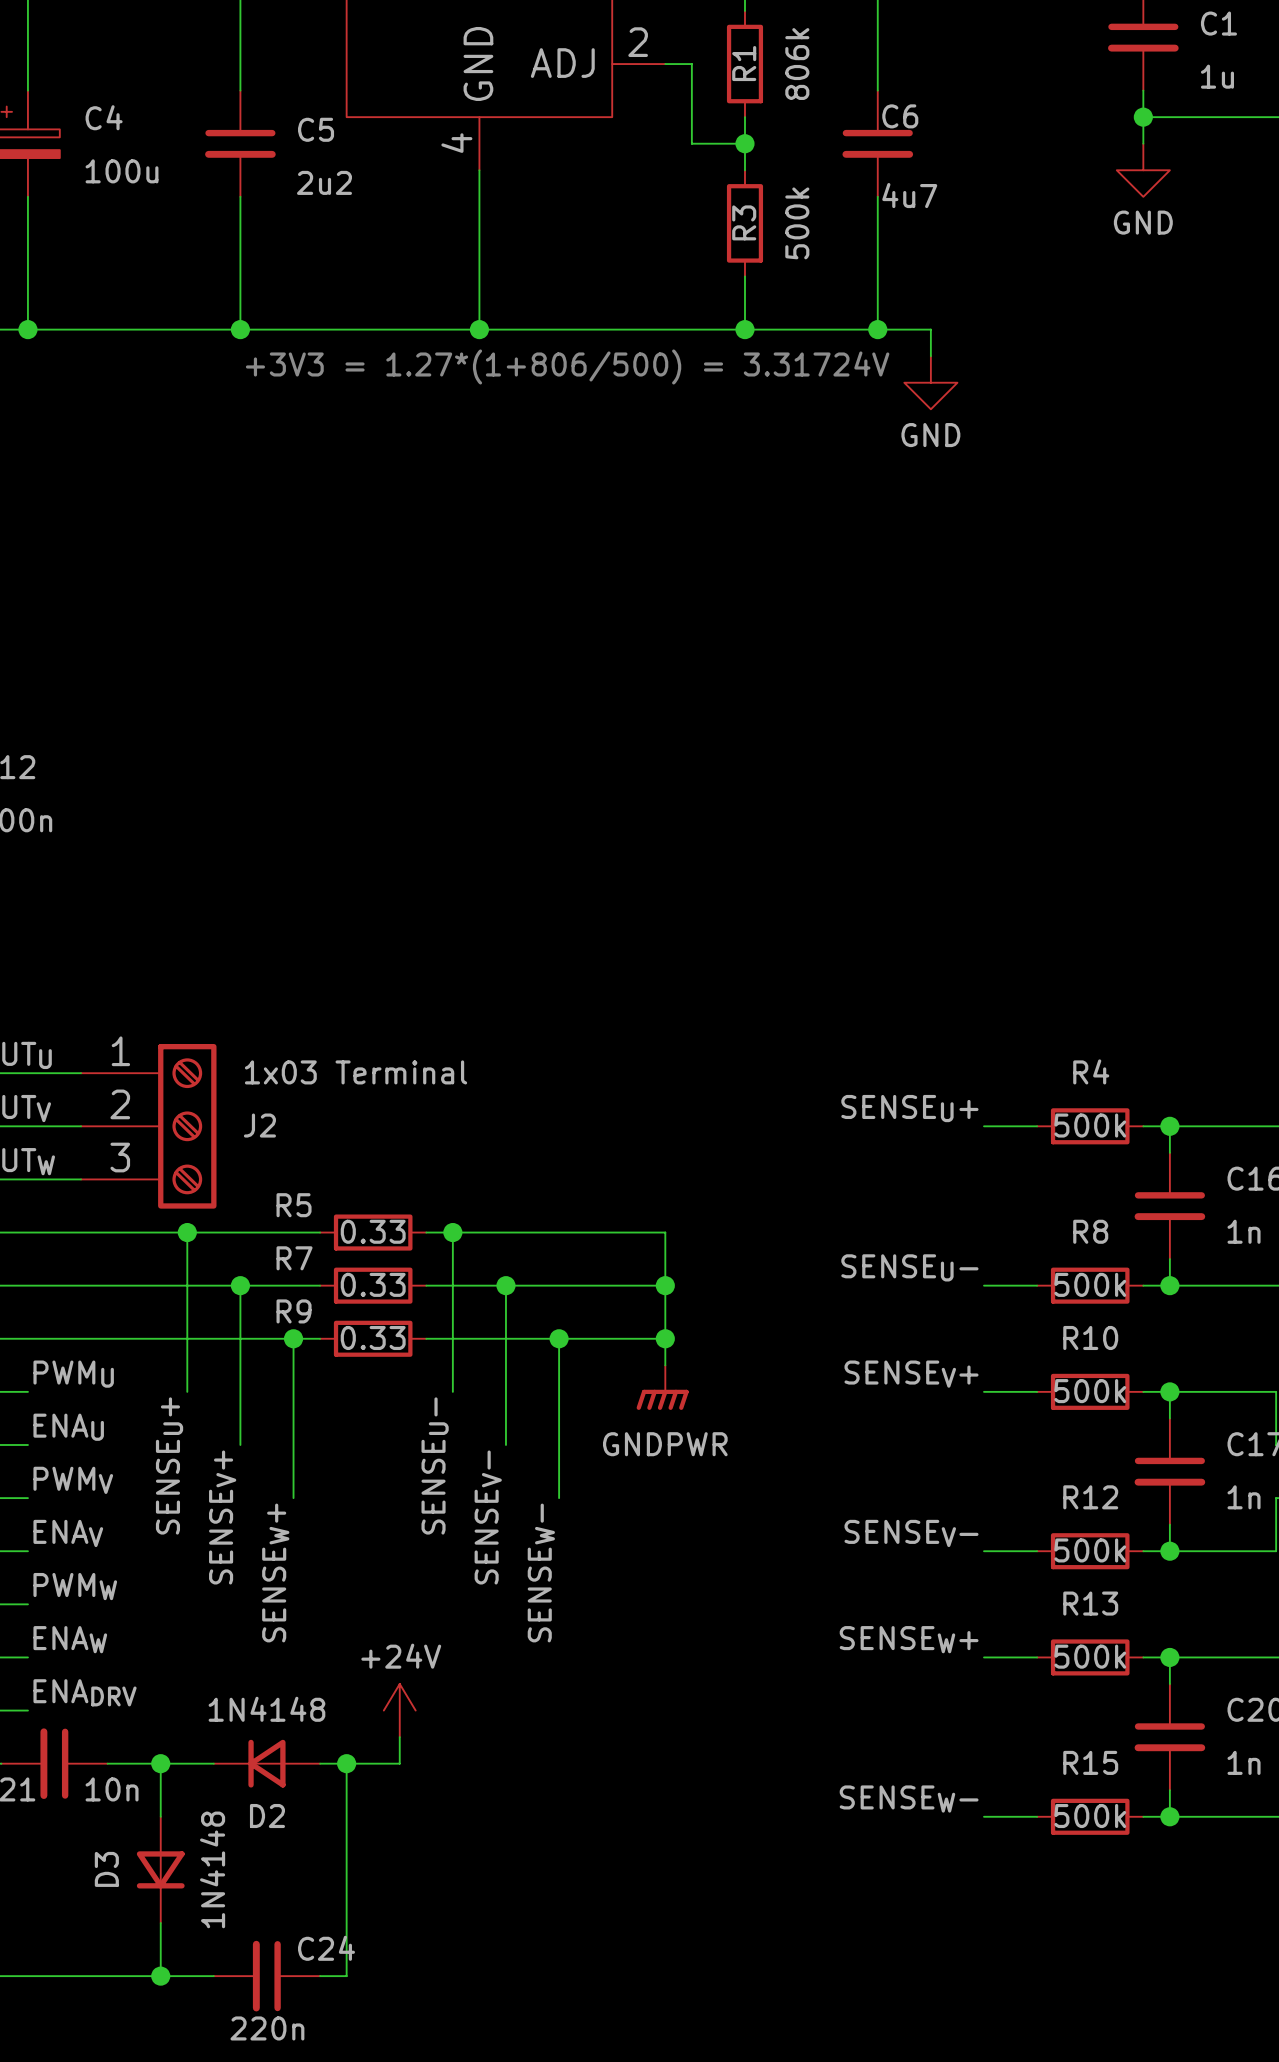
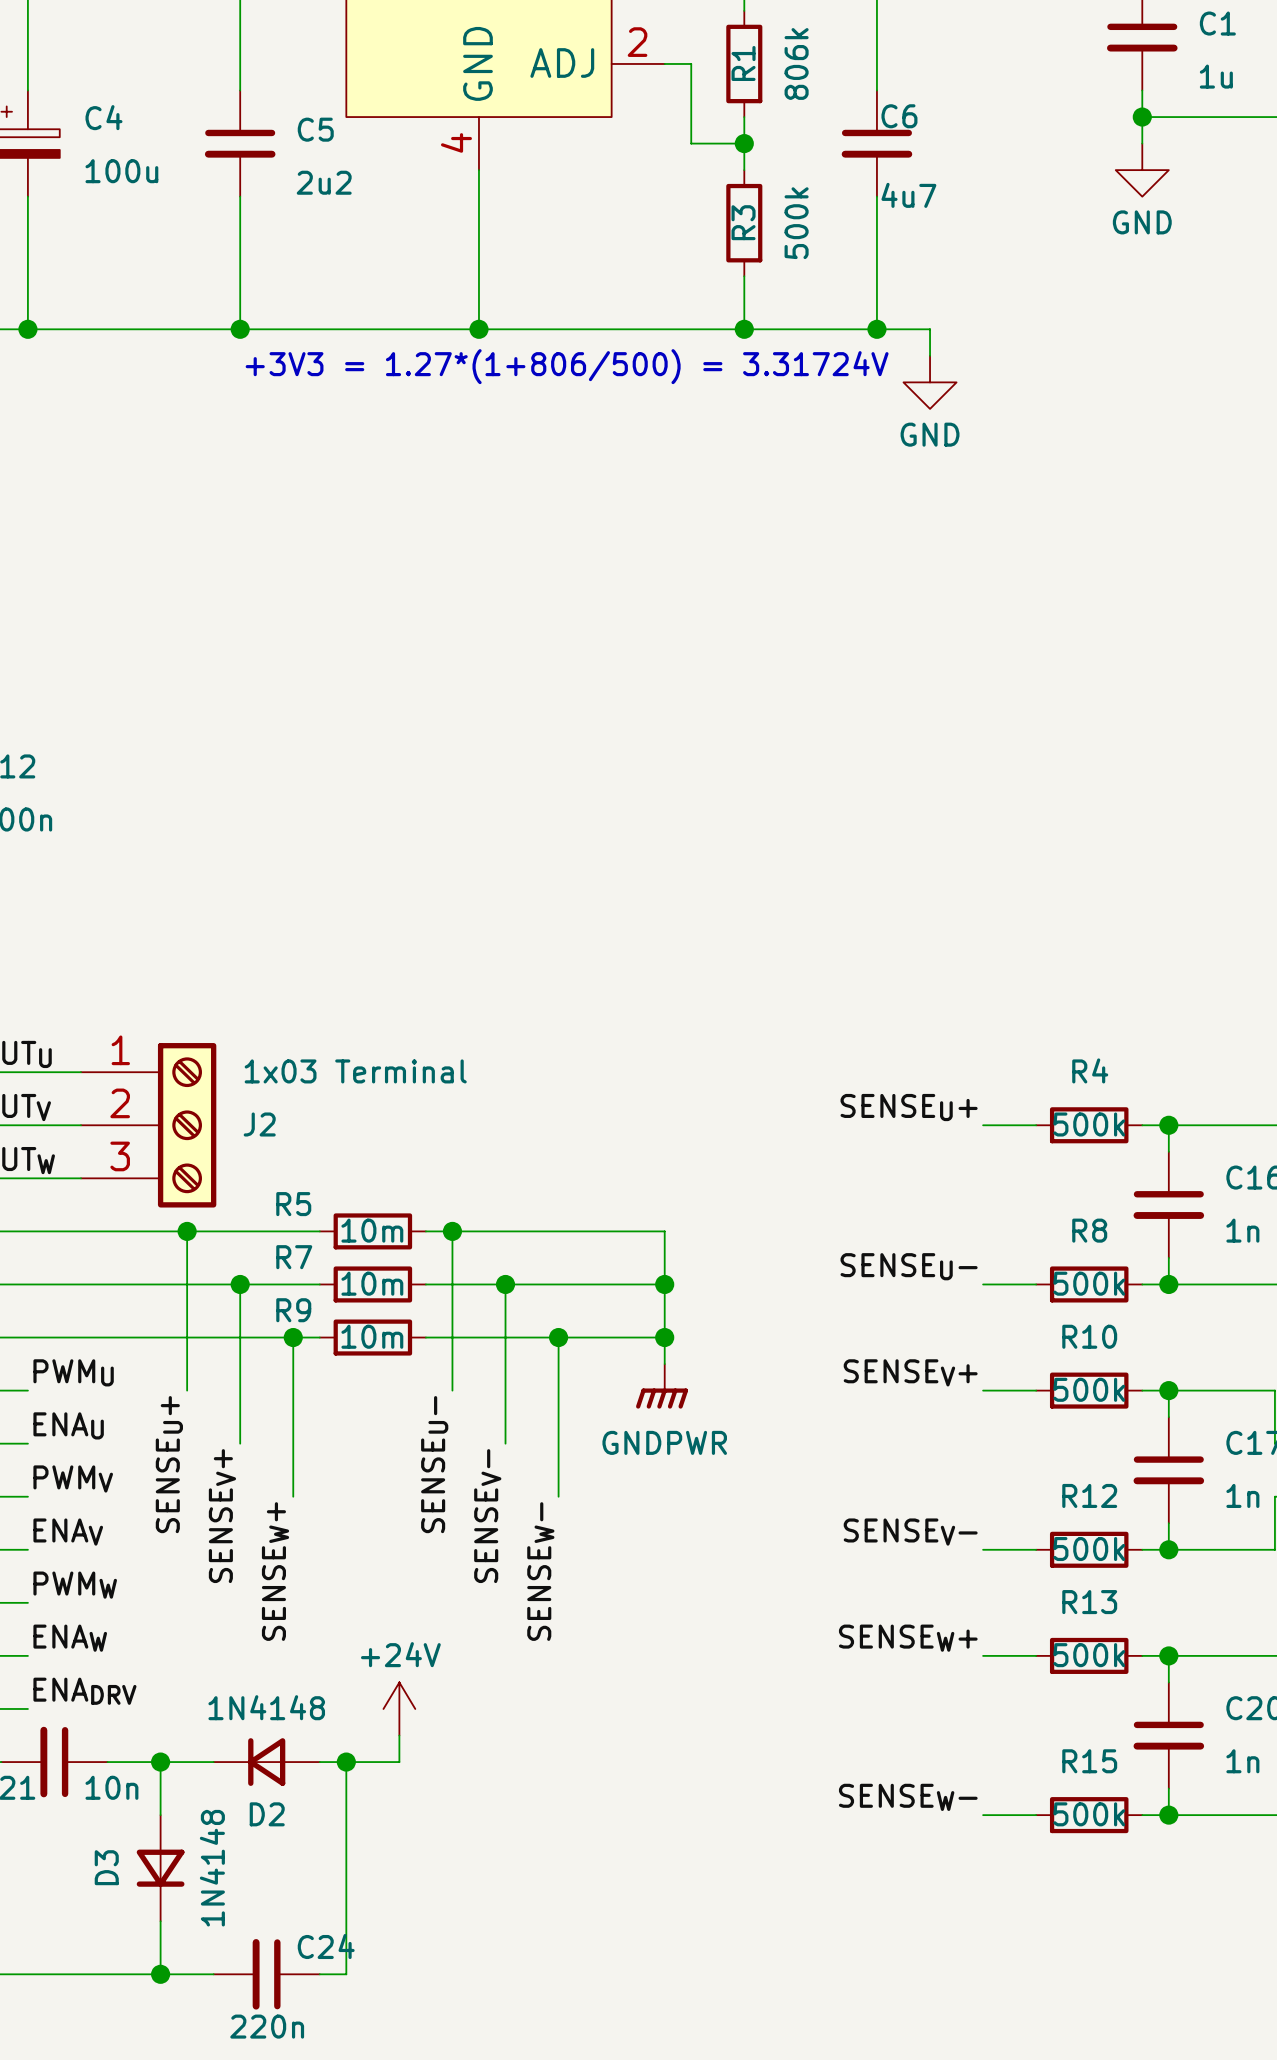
R5 value: 0.33 (373, 1231) -> 10m (372, 1230)
R7 value: 0.33 (373, 1284) -> 10m (372, 1283)
R9 value: 0.33 (373, 1337) -> 10m (372, 1336)

